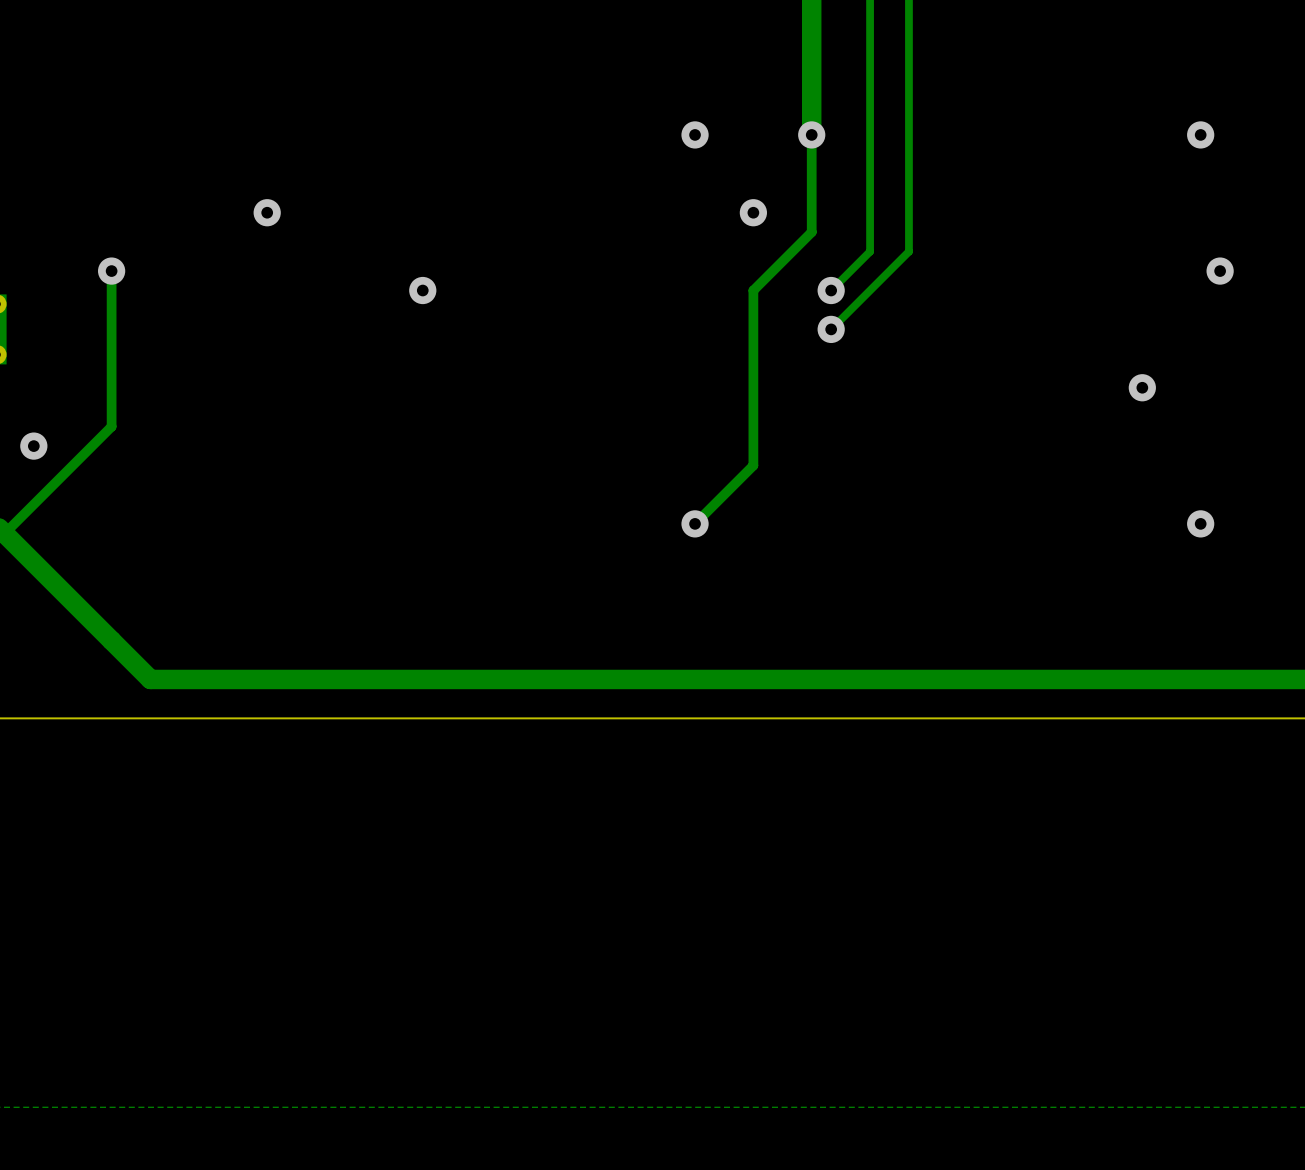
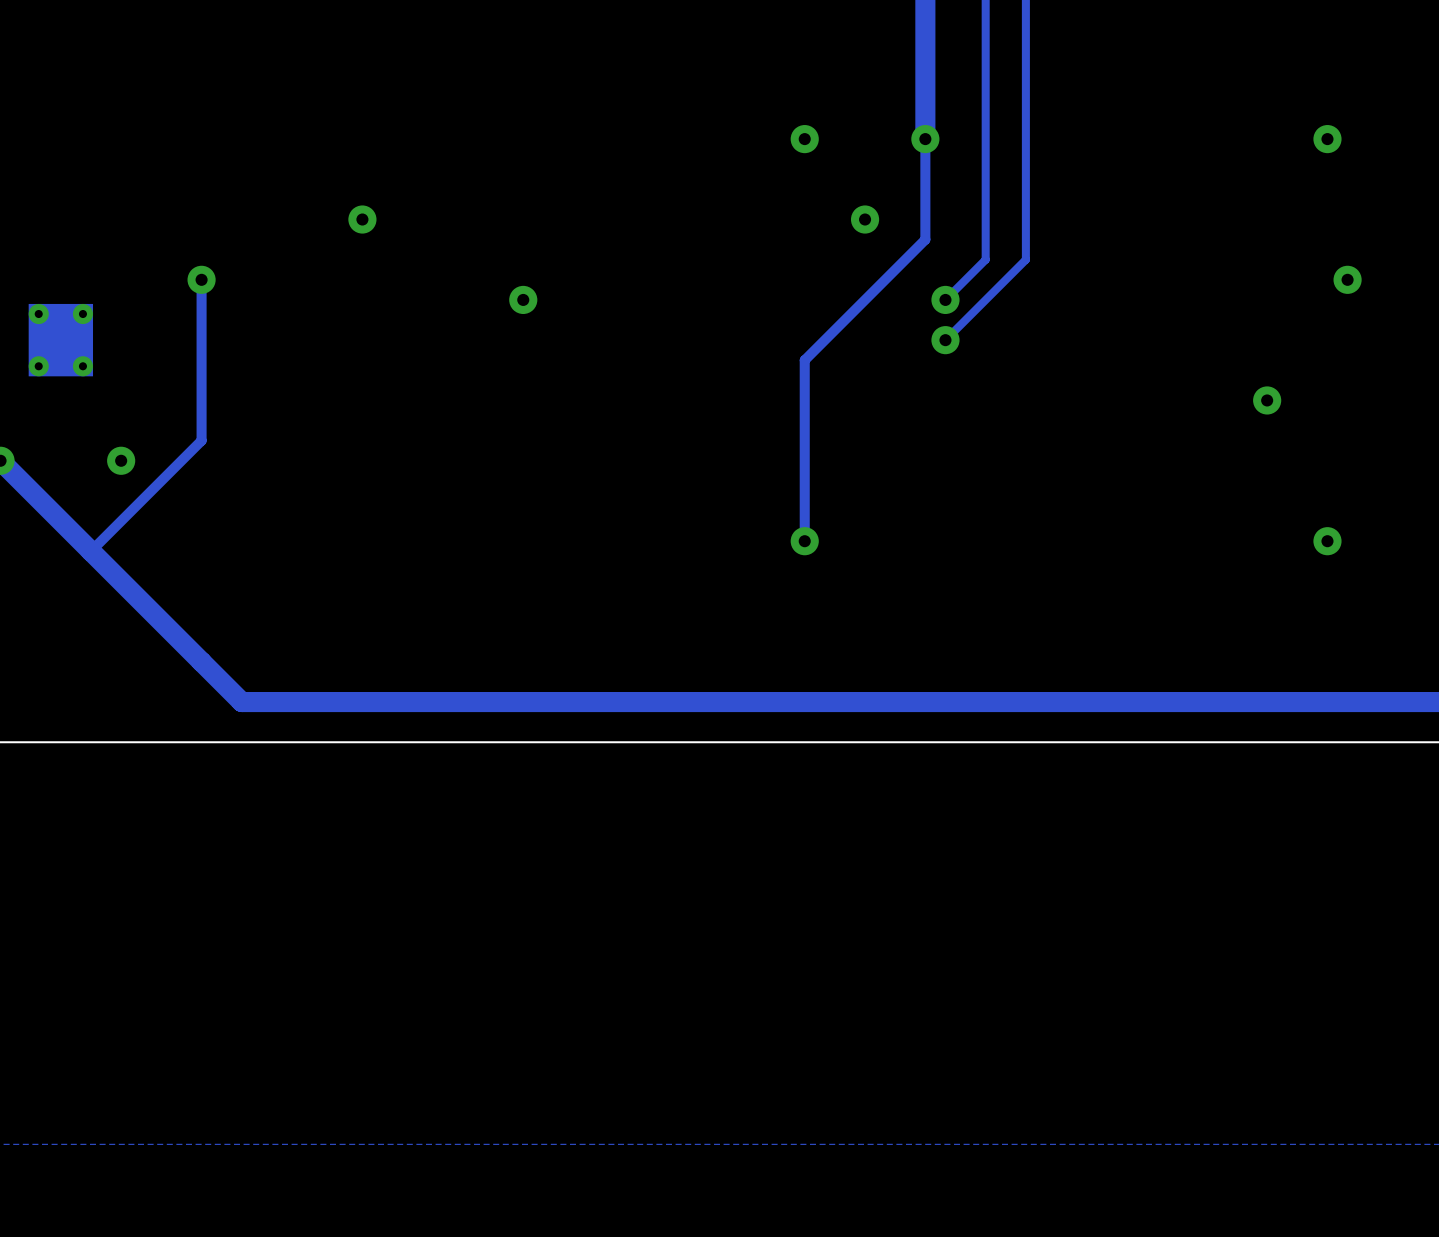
track: (753, 290) (753, 465) (695, 523) -> (865, 299) (804, 360) (804, 541)

